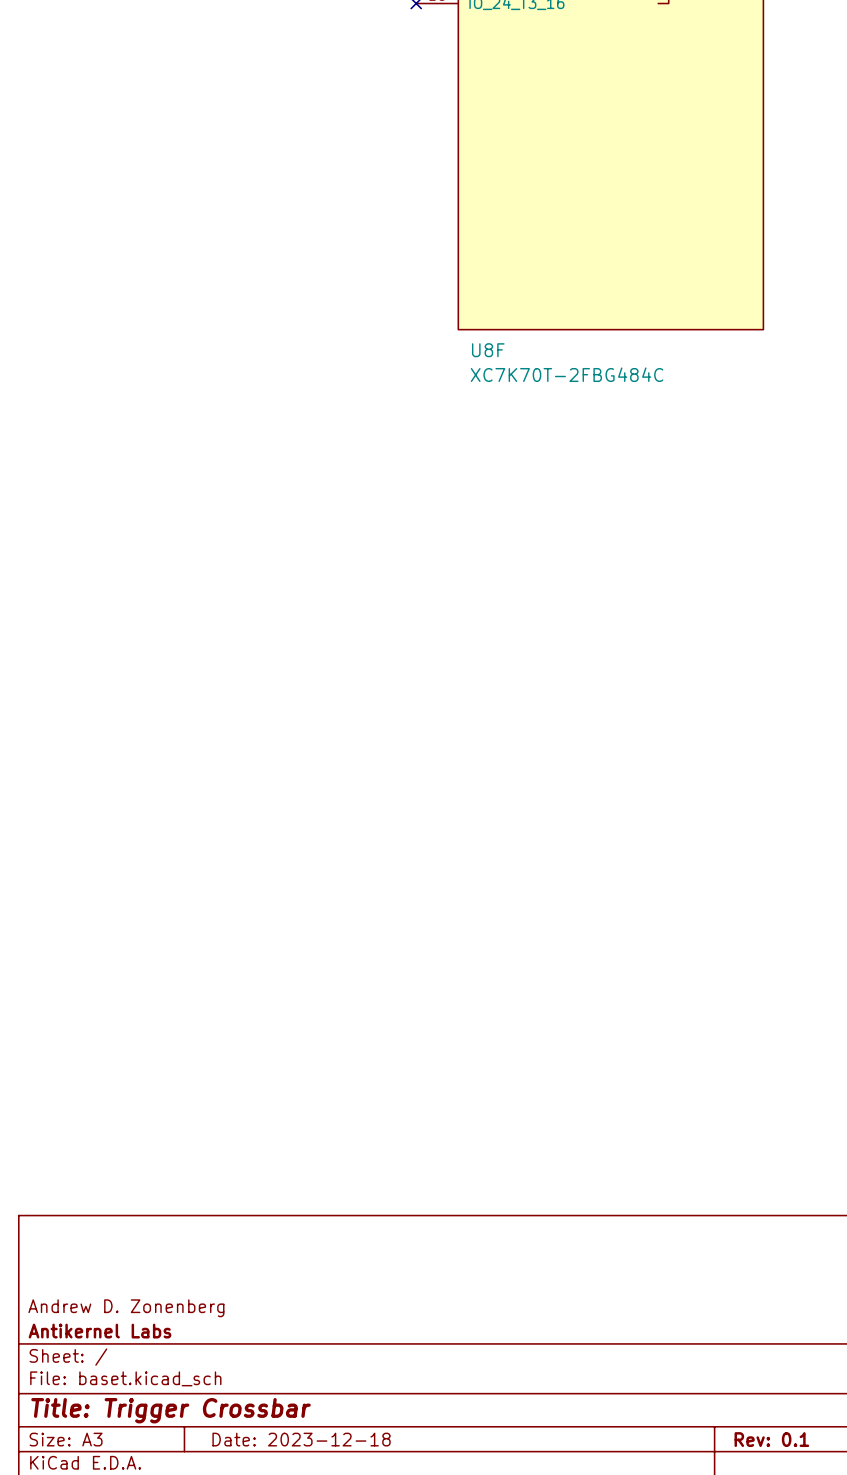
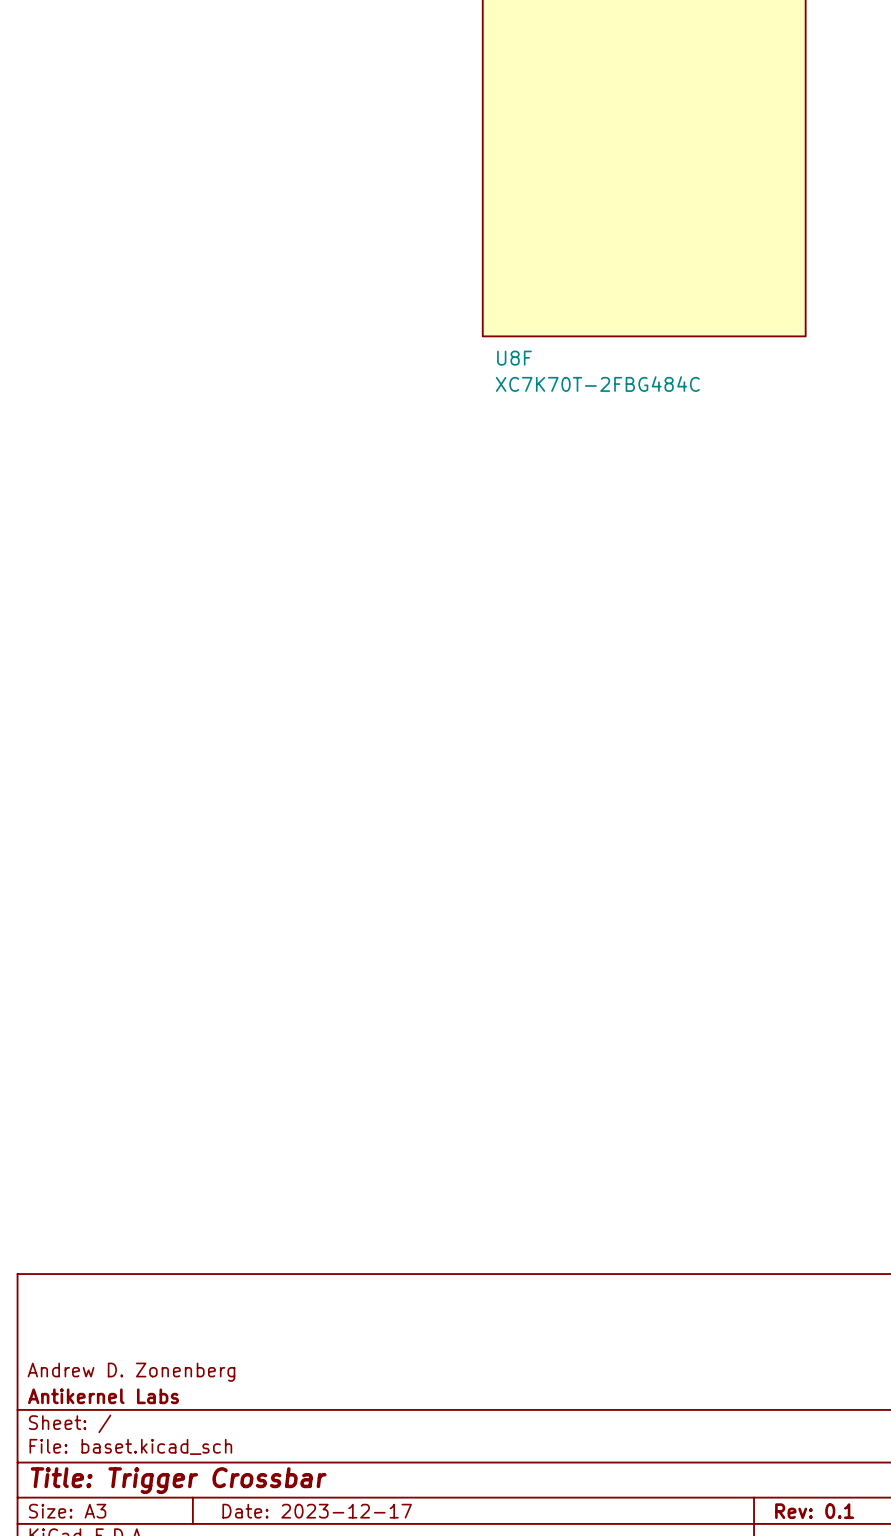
title block: Date: 2023-12-18 (301, 1439) -> Date: 2023-12-17 (317, 1511)

